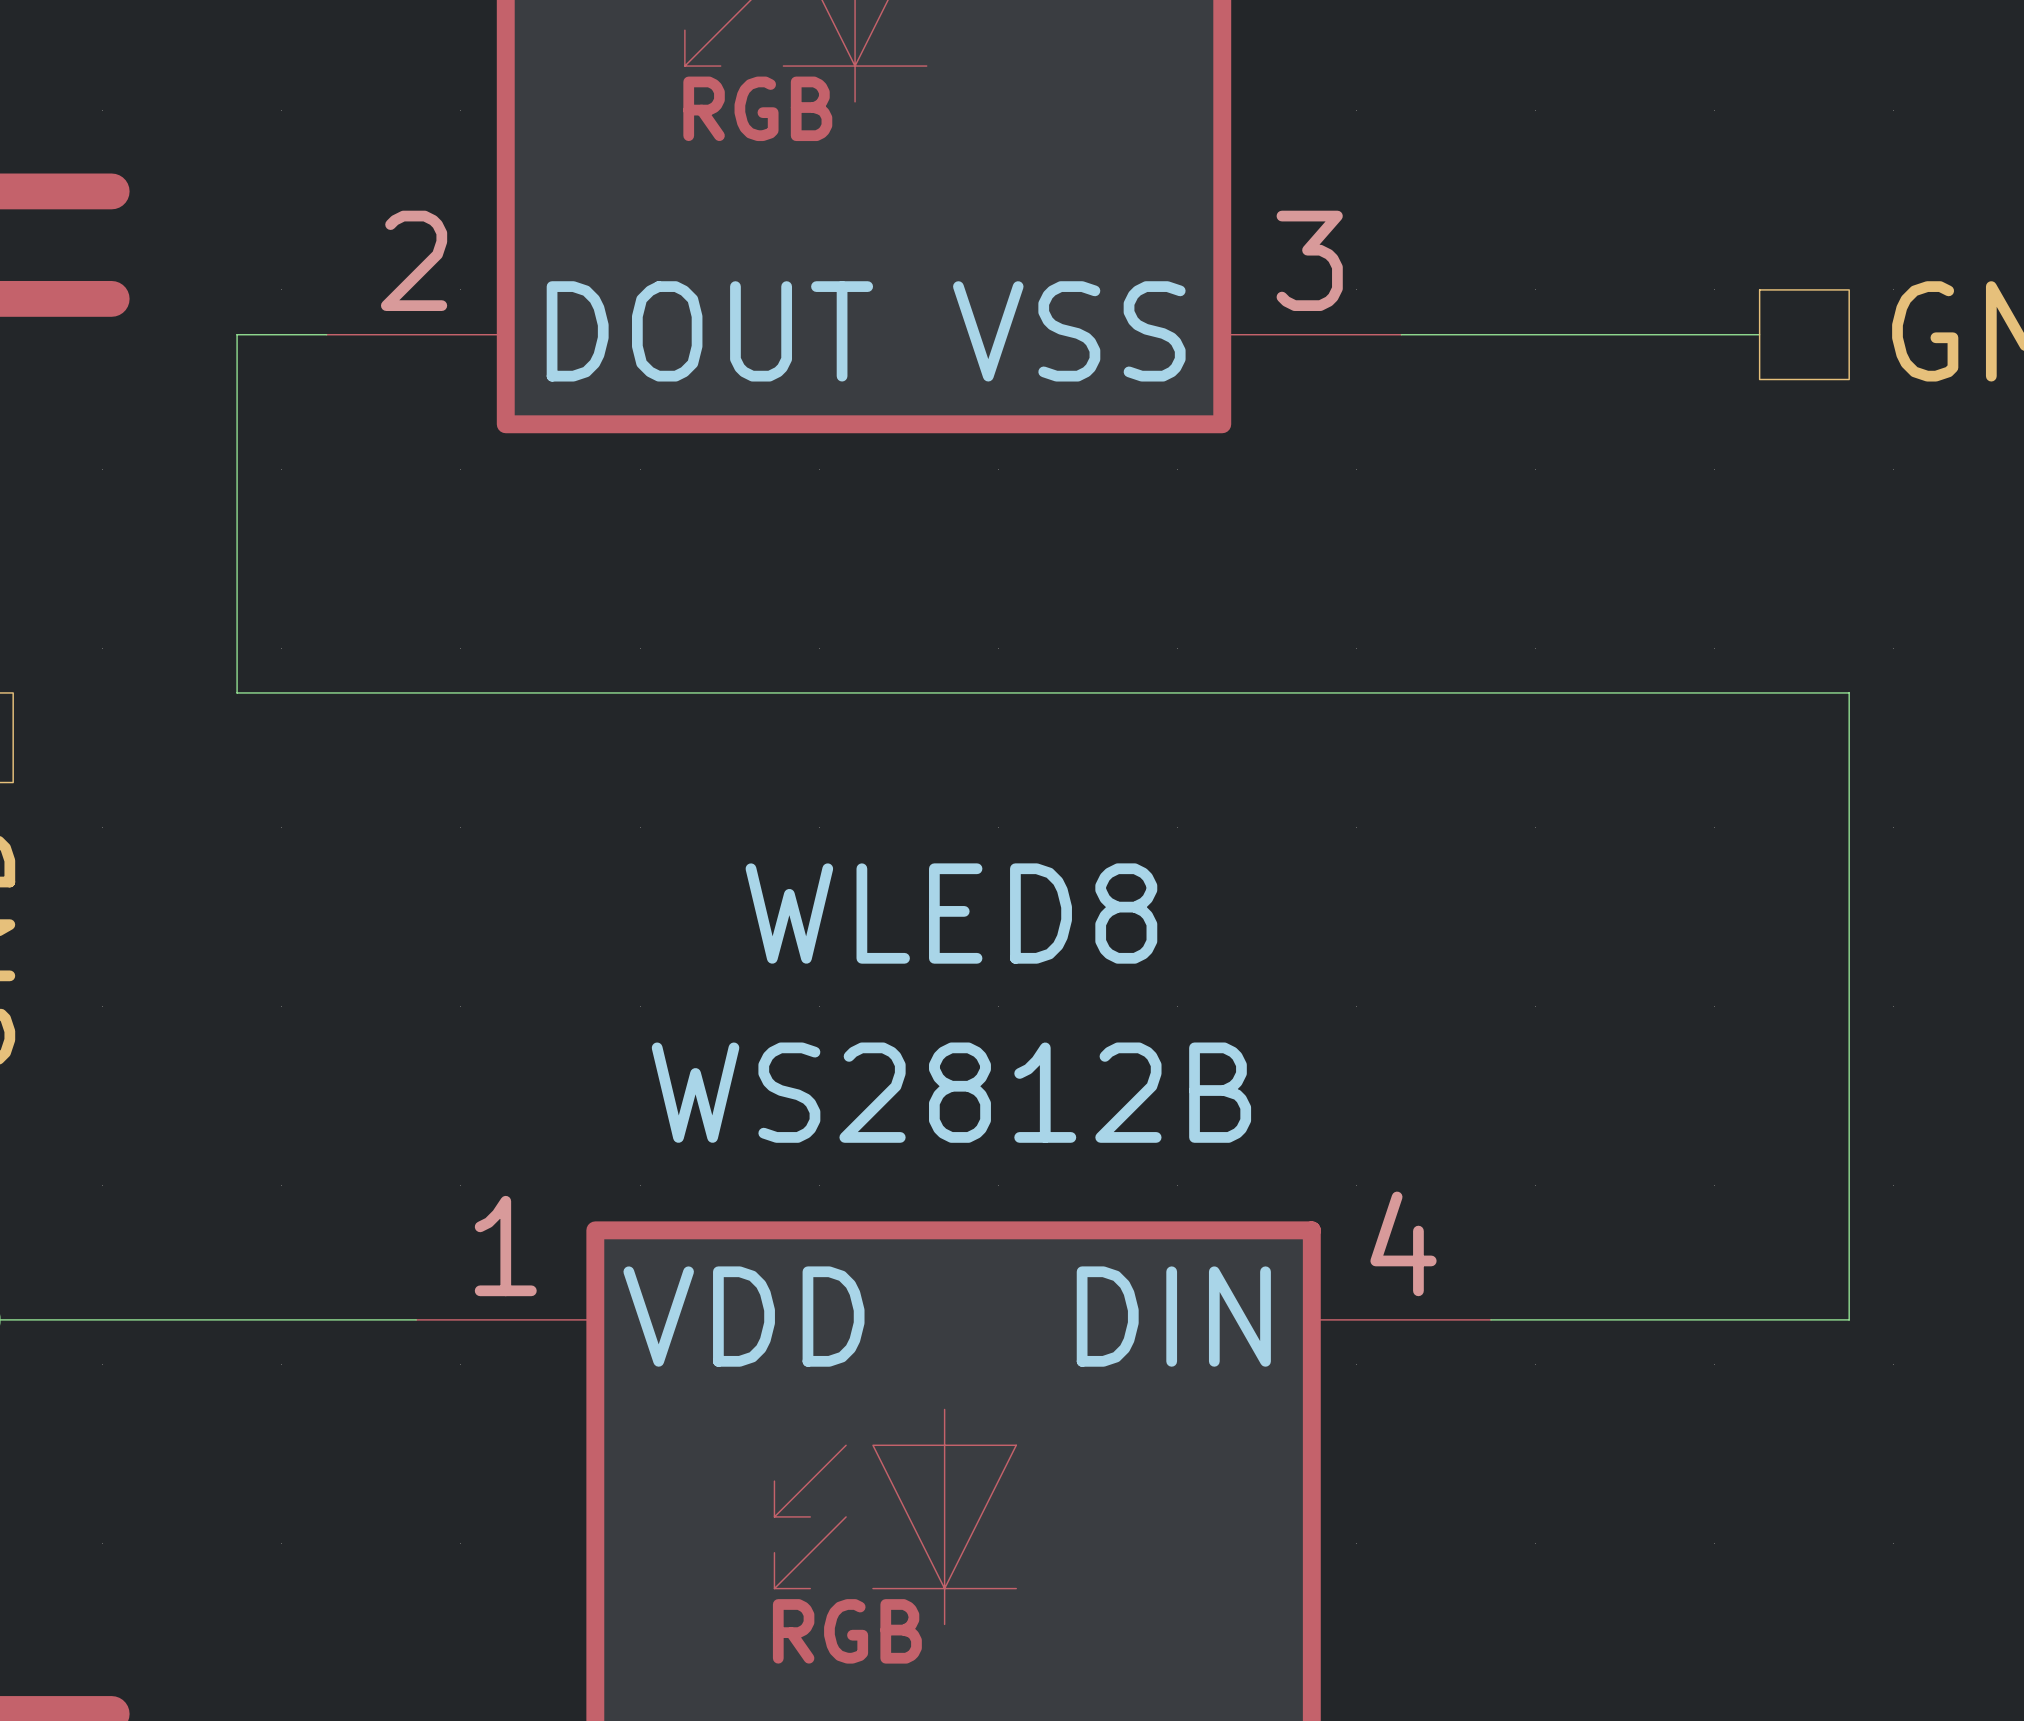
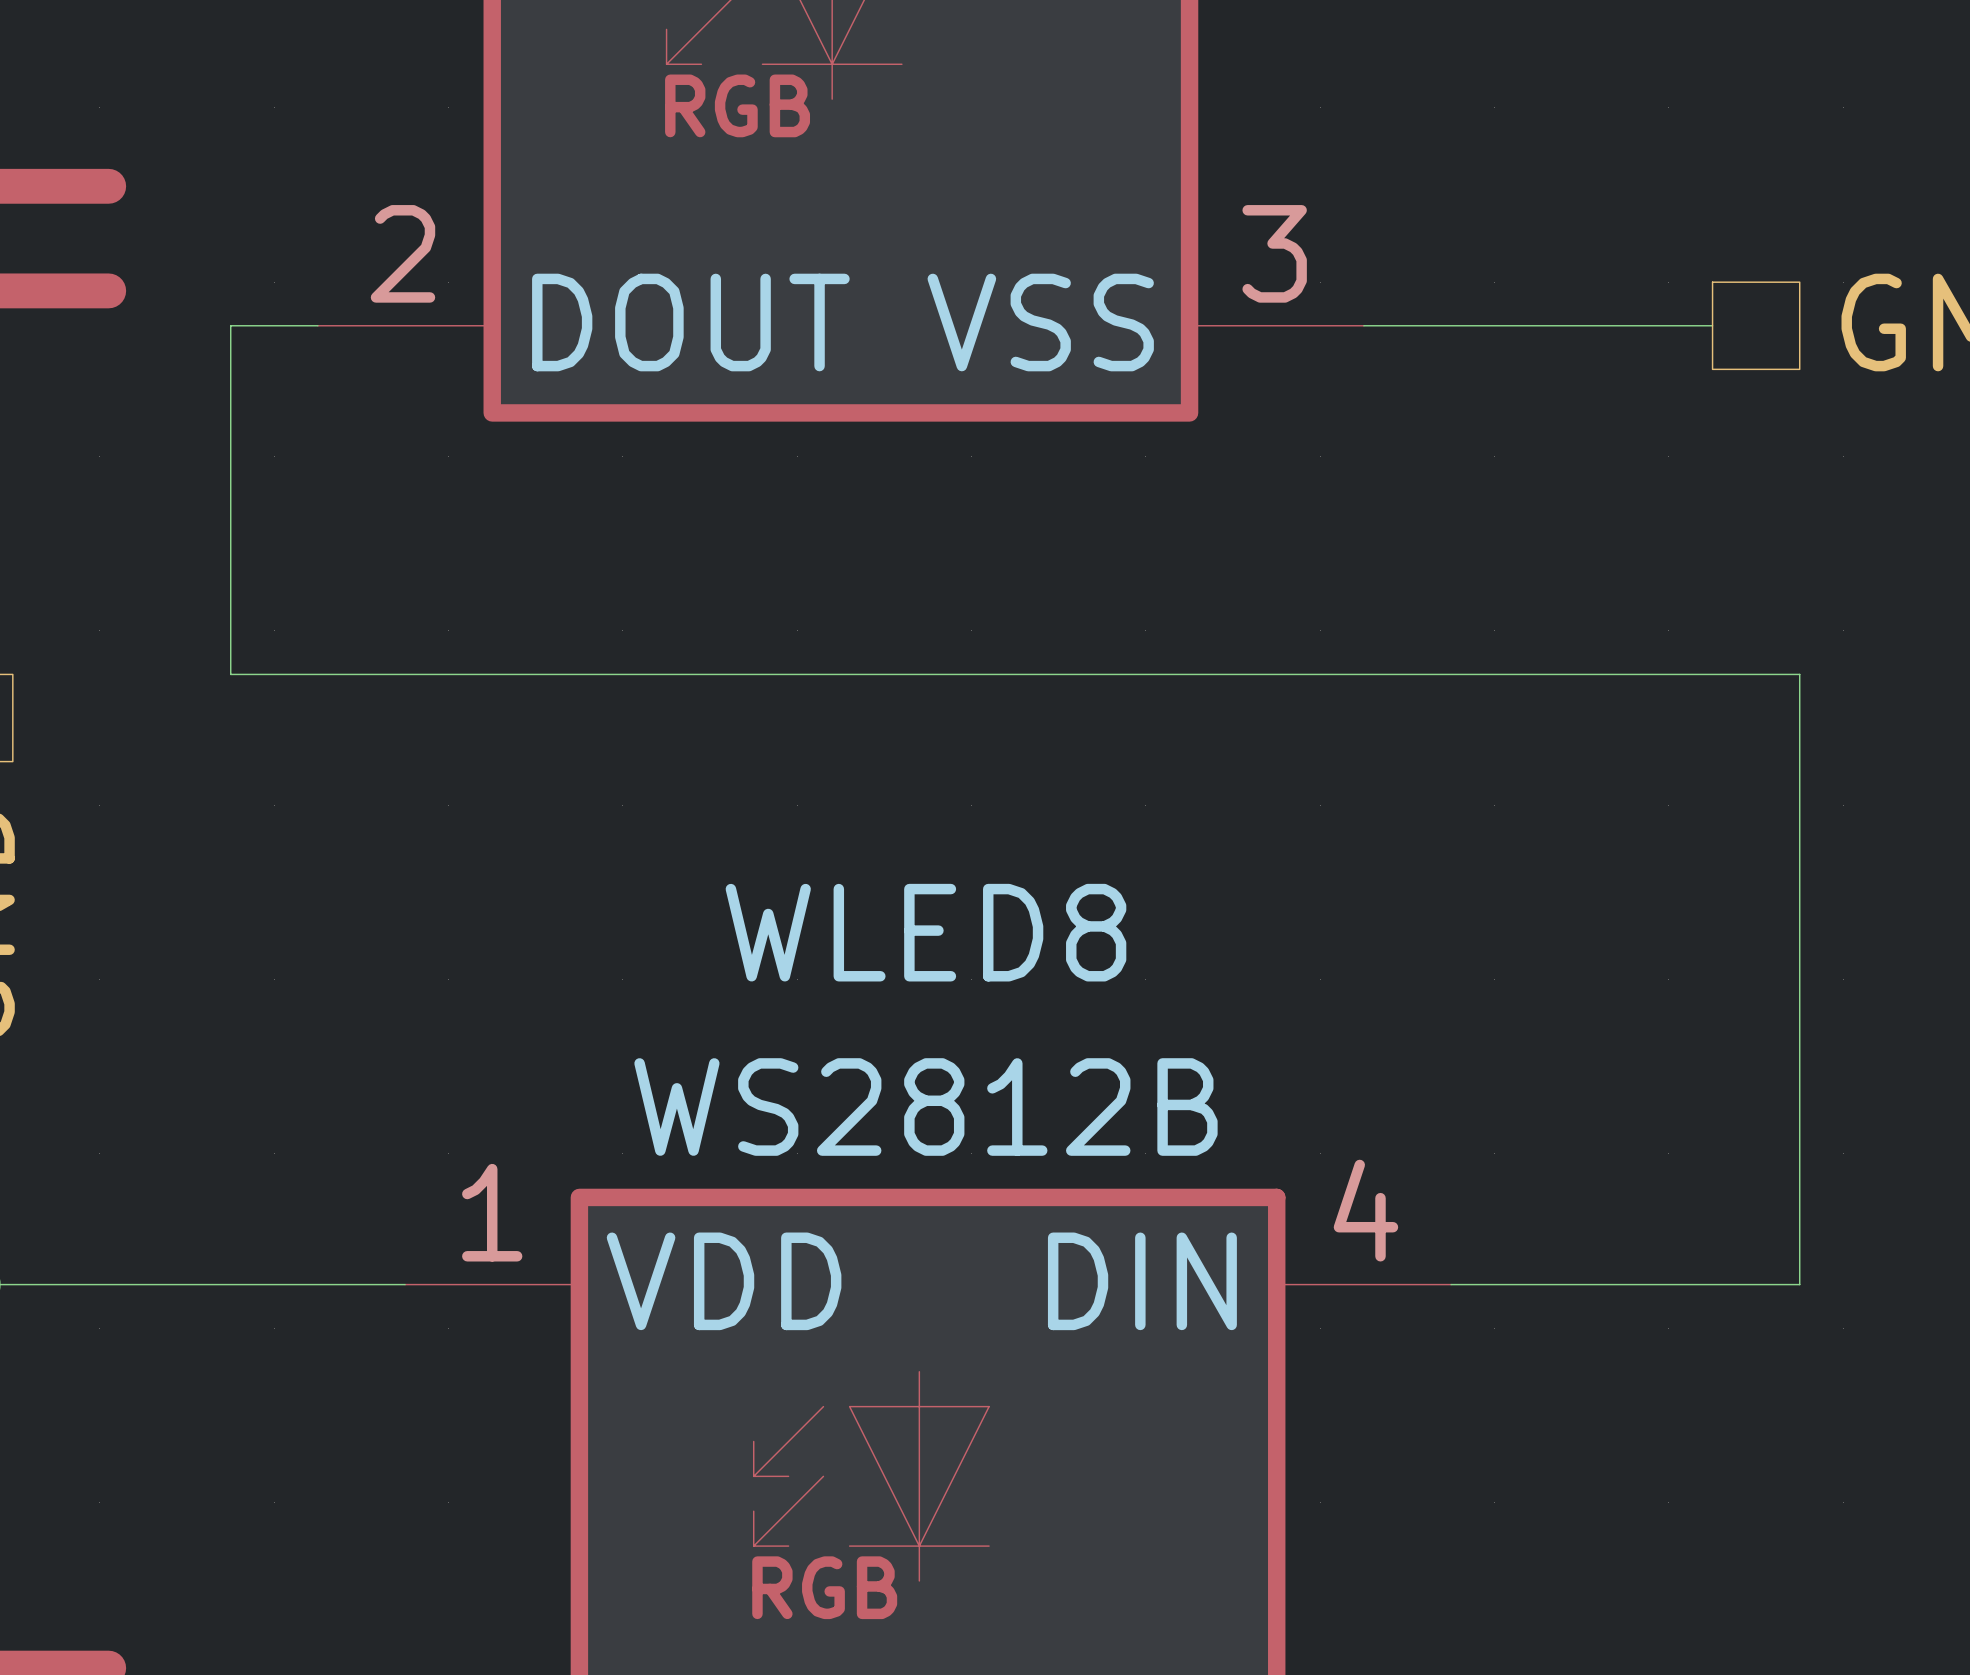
WLED8 name position: WLED8 (951, 913) -> WLED8 (925, 932)
WLED8 value position: WS2812B (951, 1092) -> WS2812B (925, 1107)

